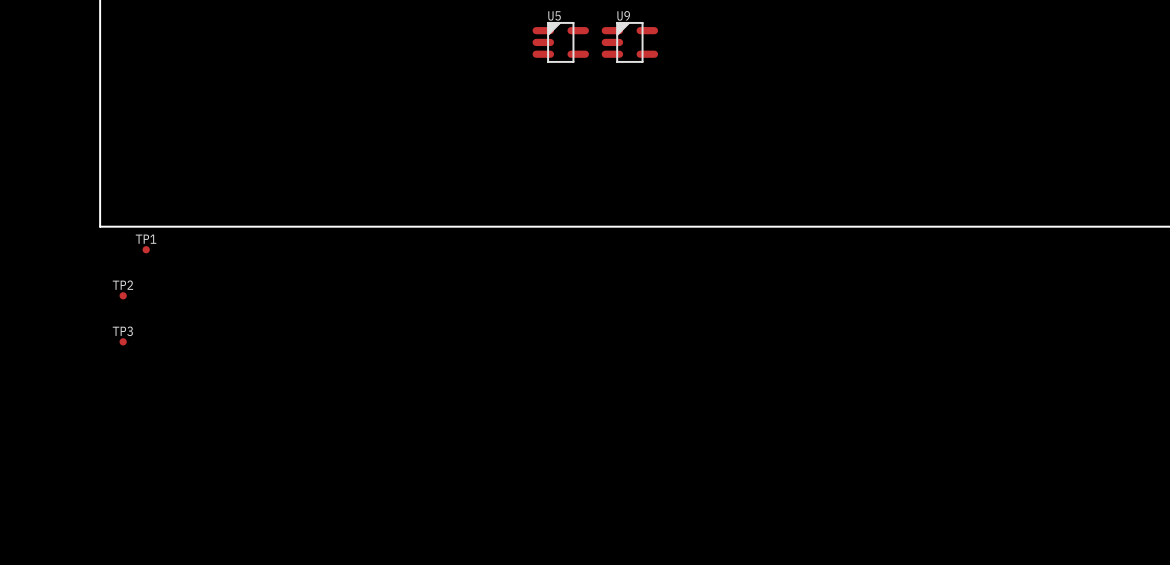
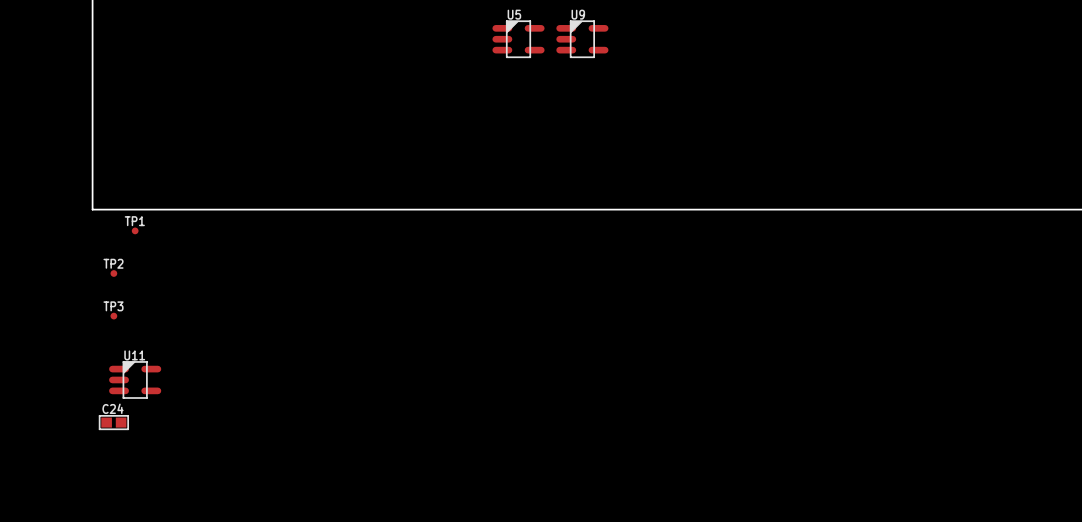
U11: none -> (135, 379)
C24: none -> (113, 422)

